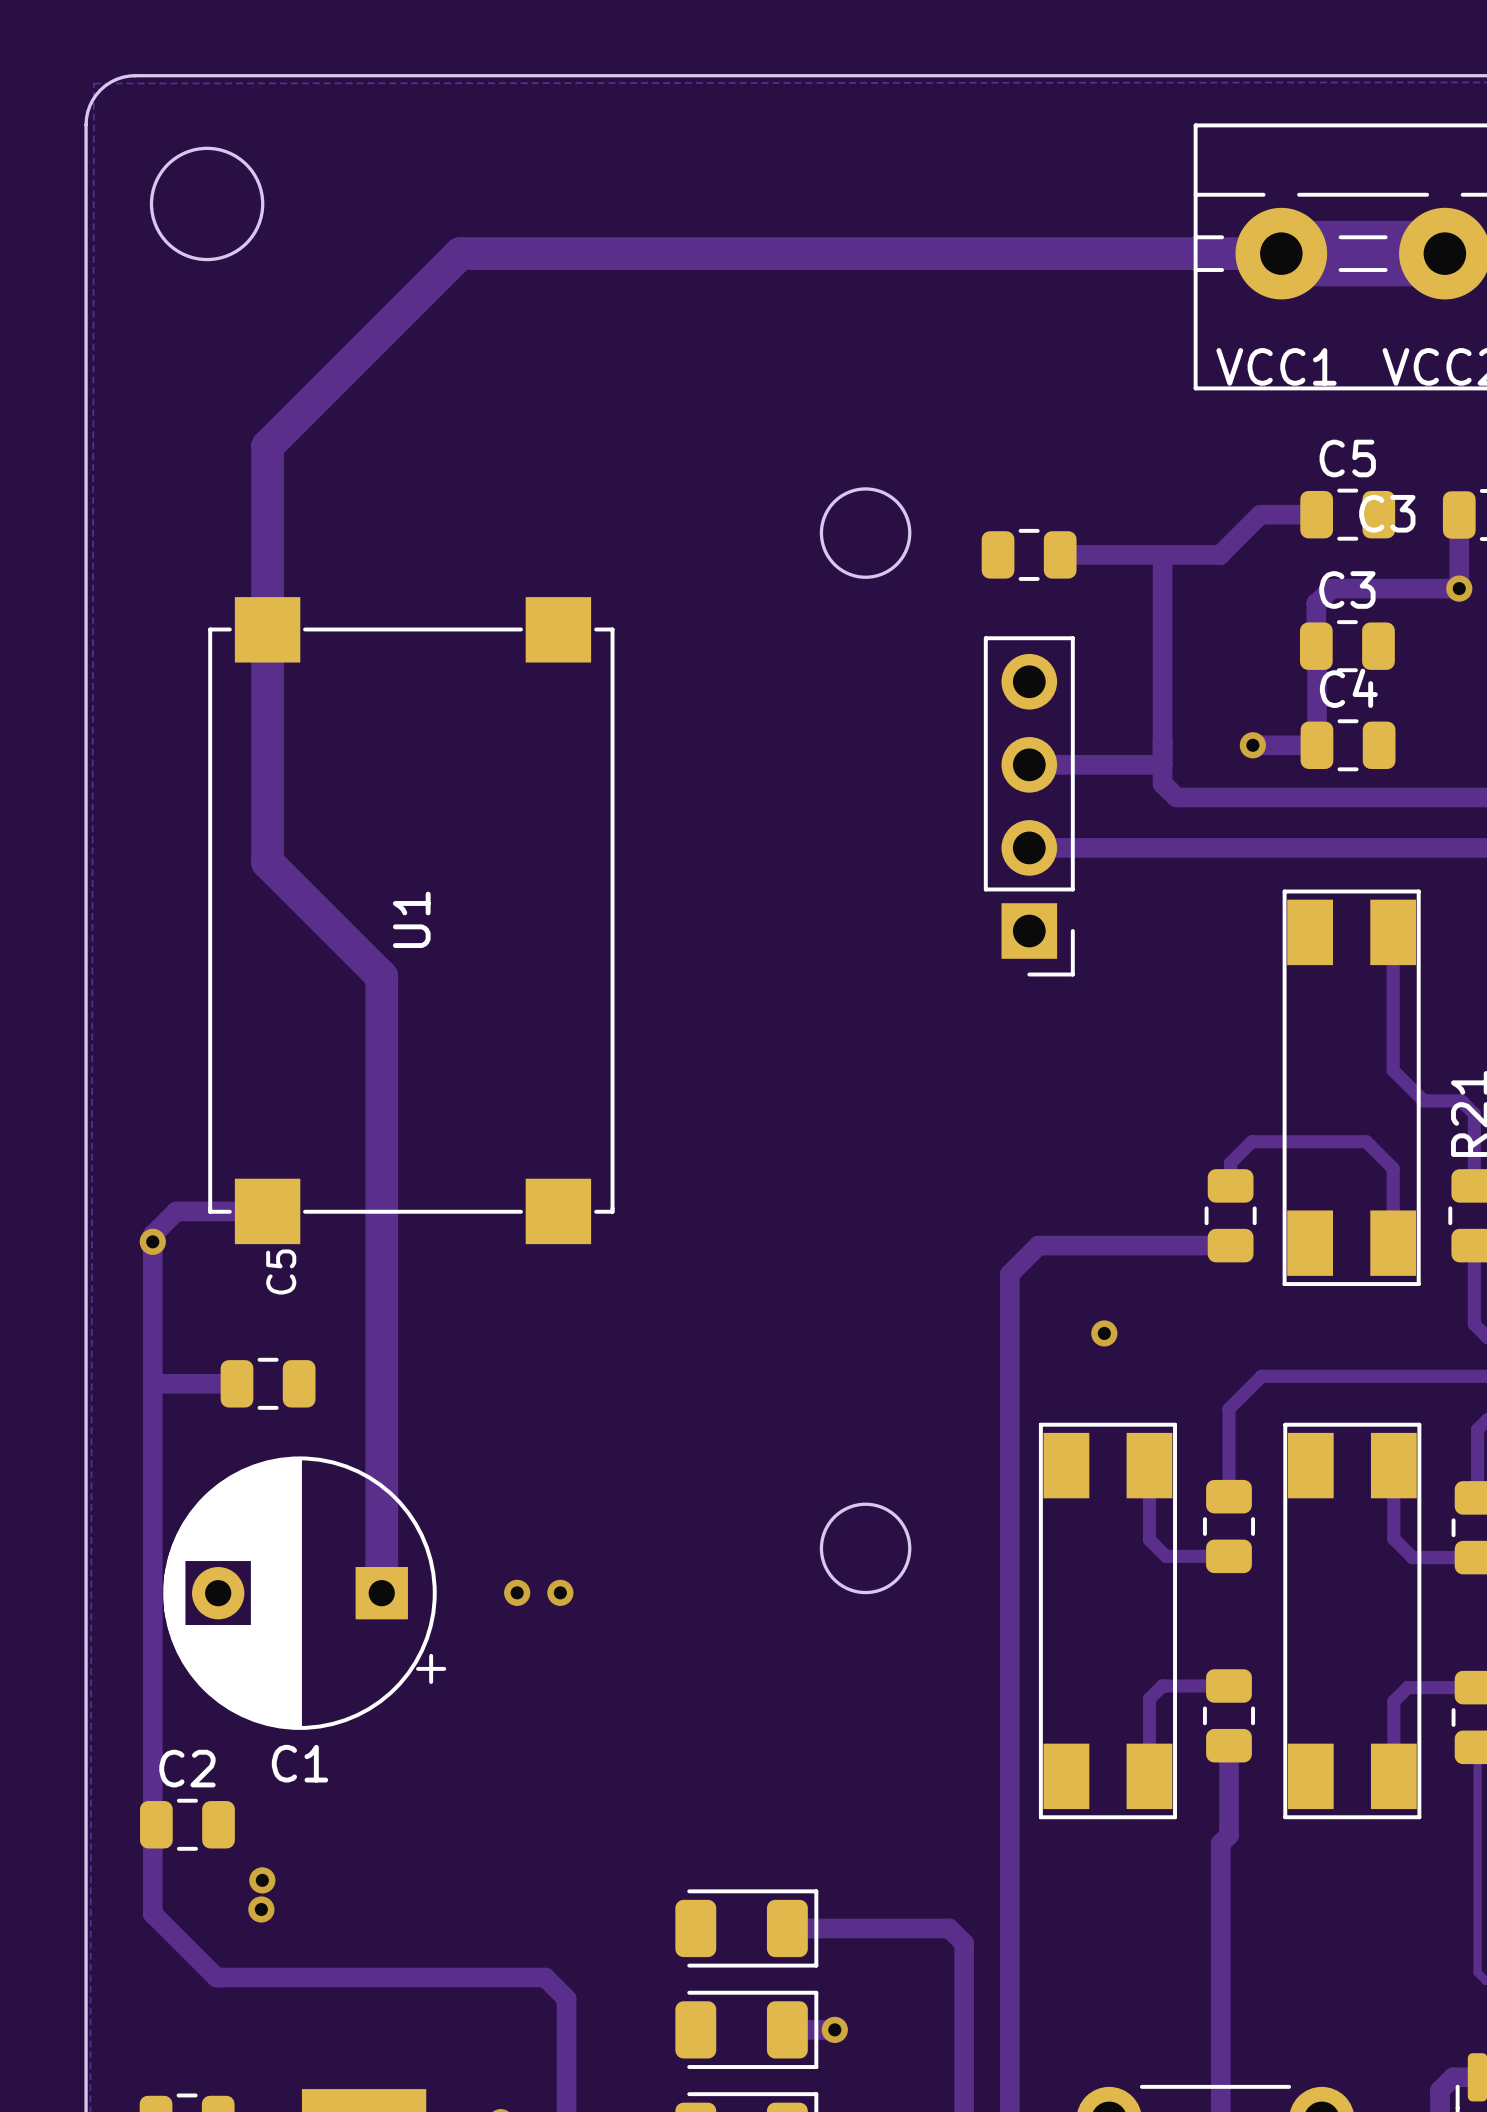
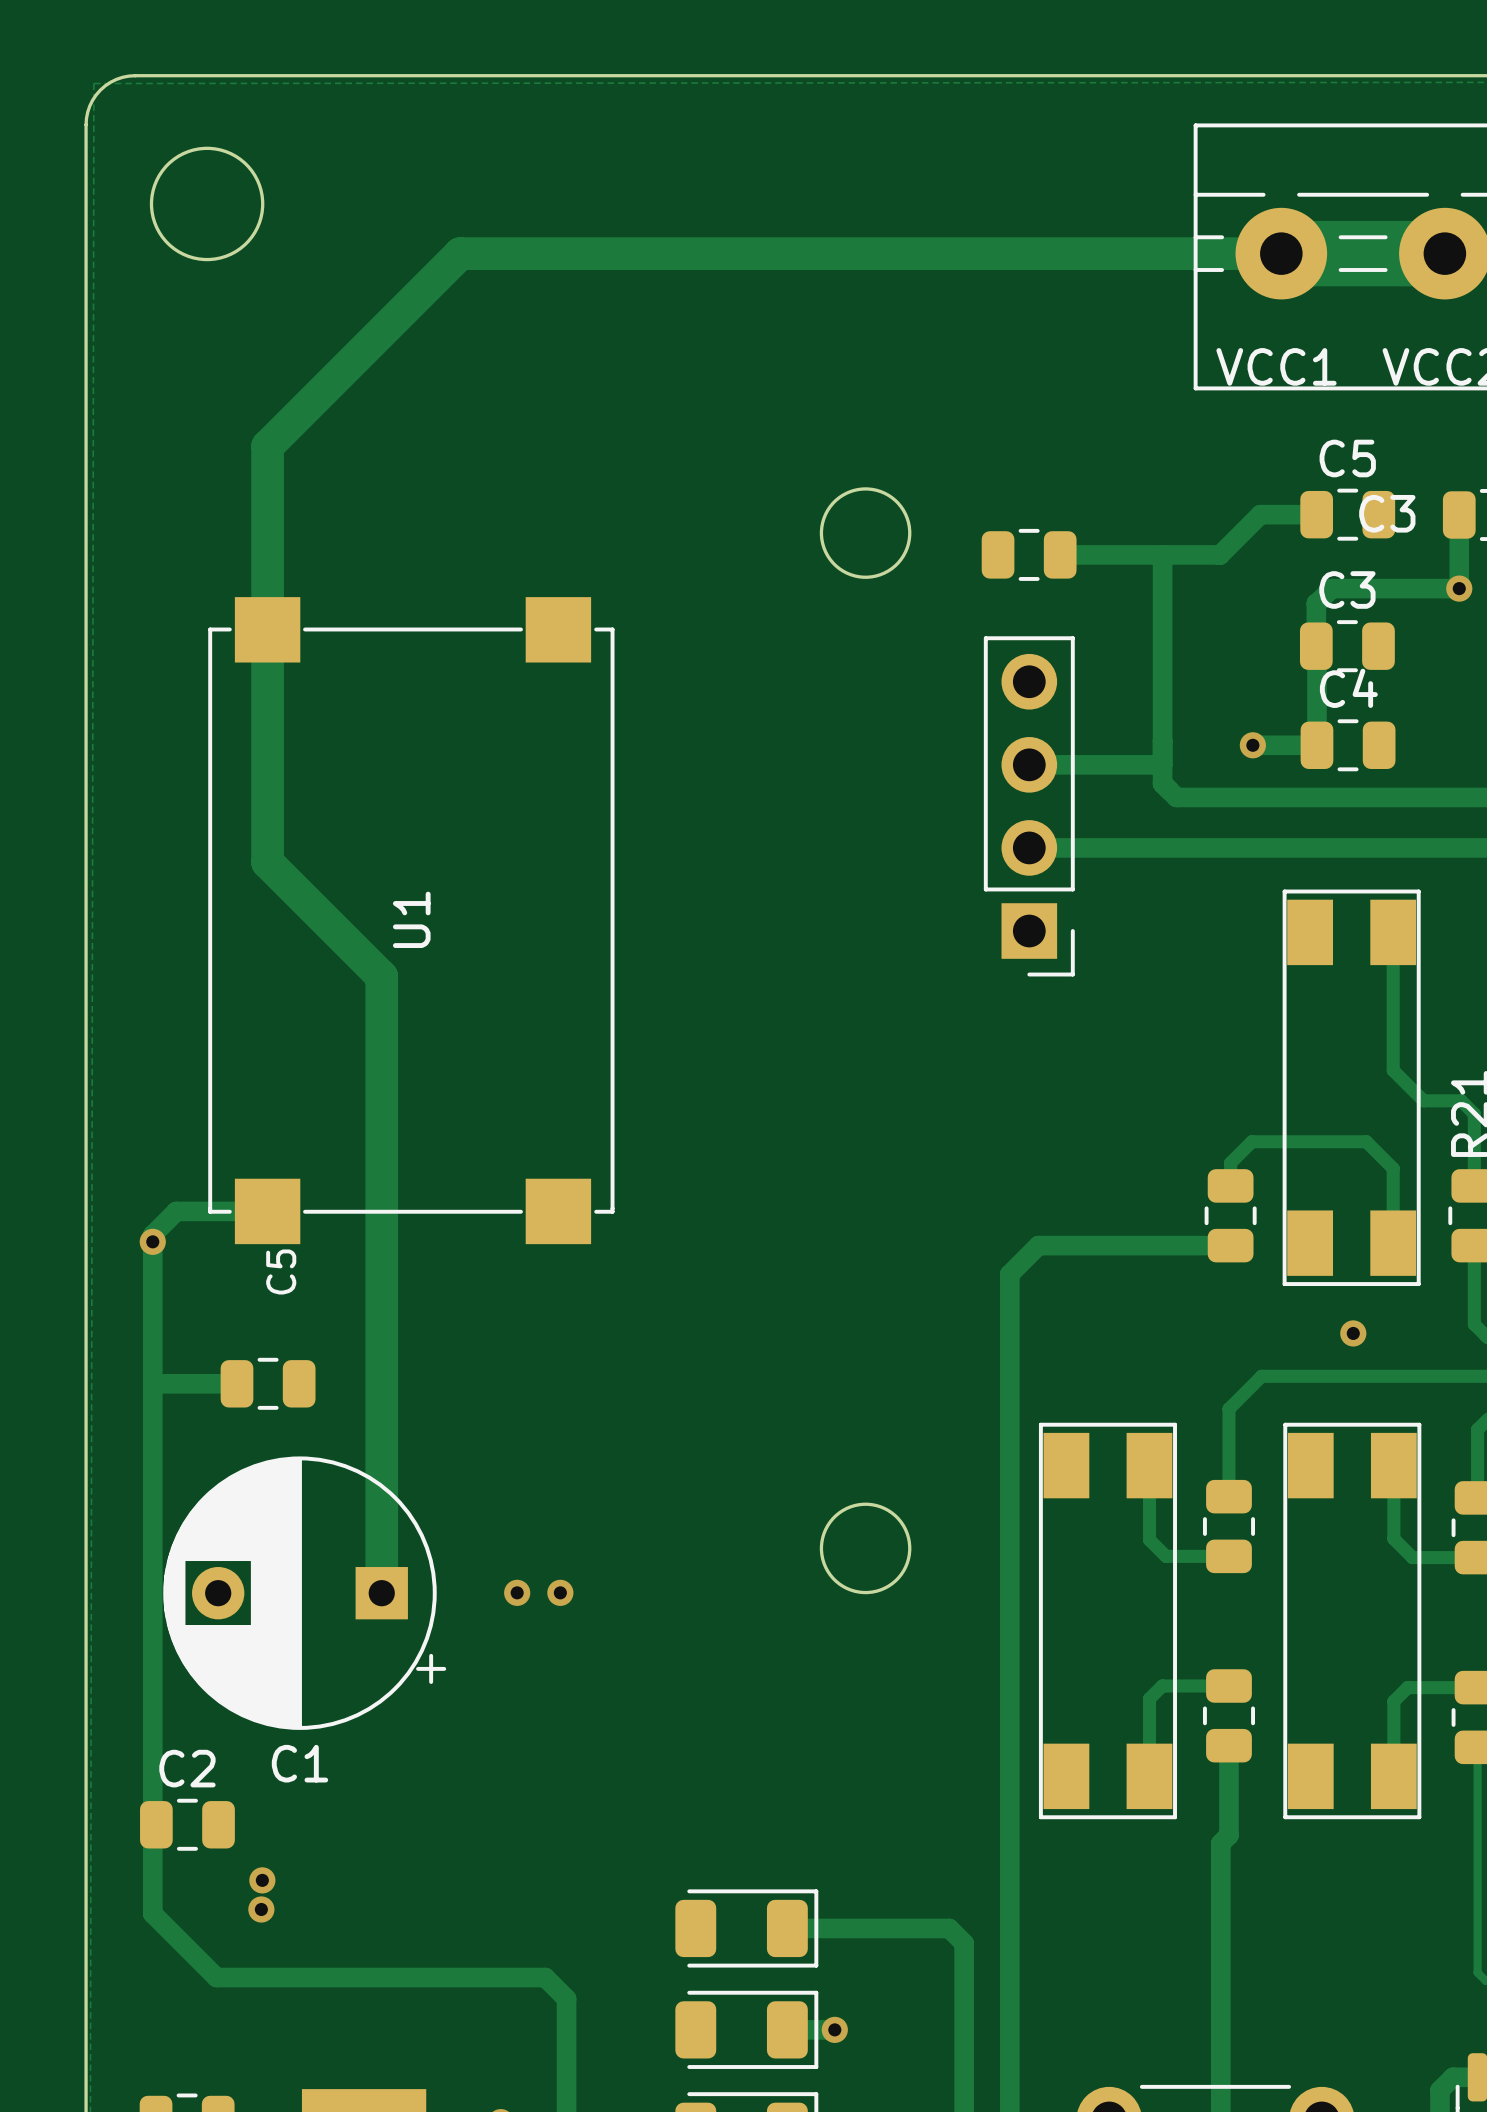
via: (1104, 1333) -> none
via: none -> (1353, 1333)

